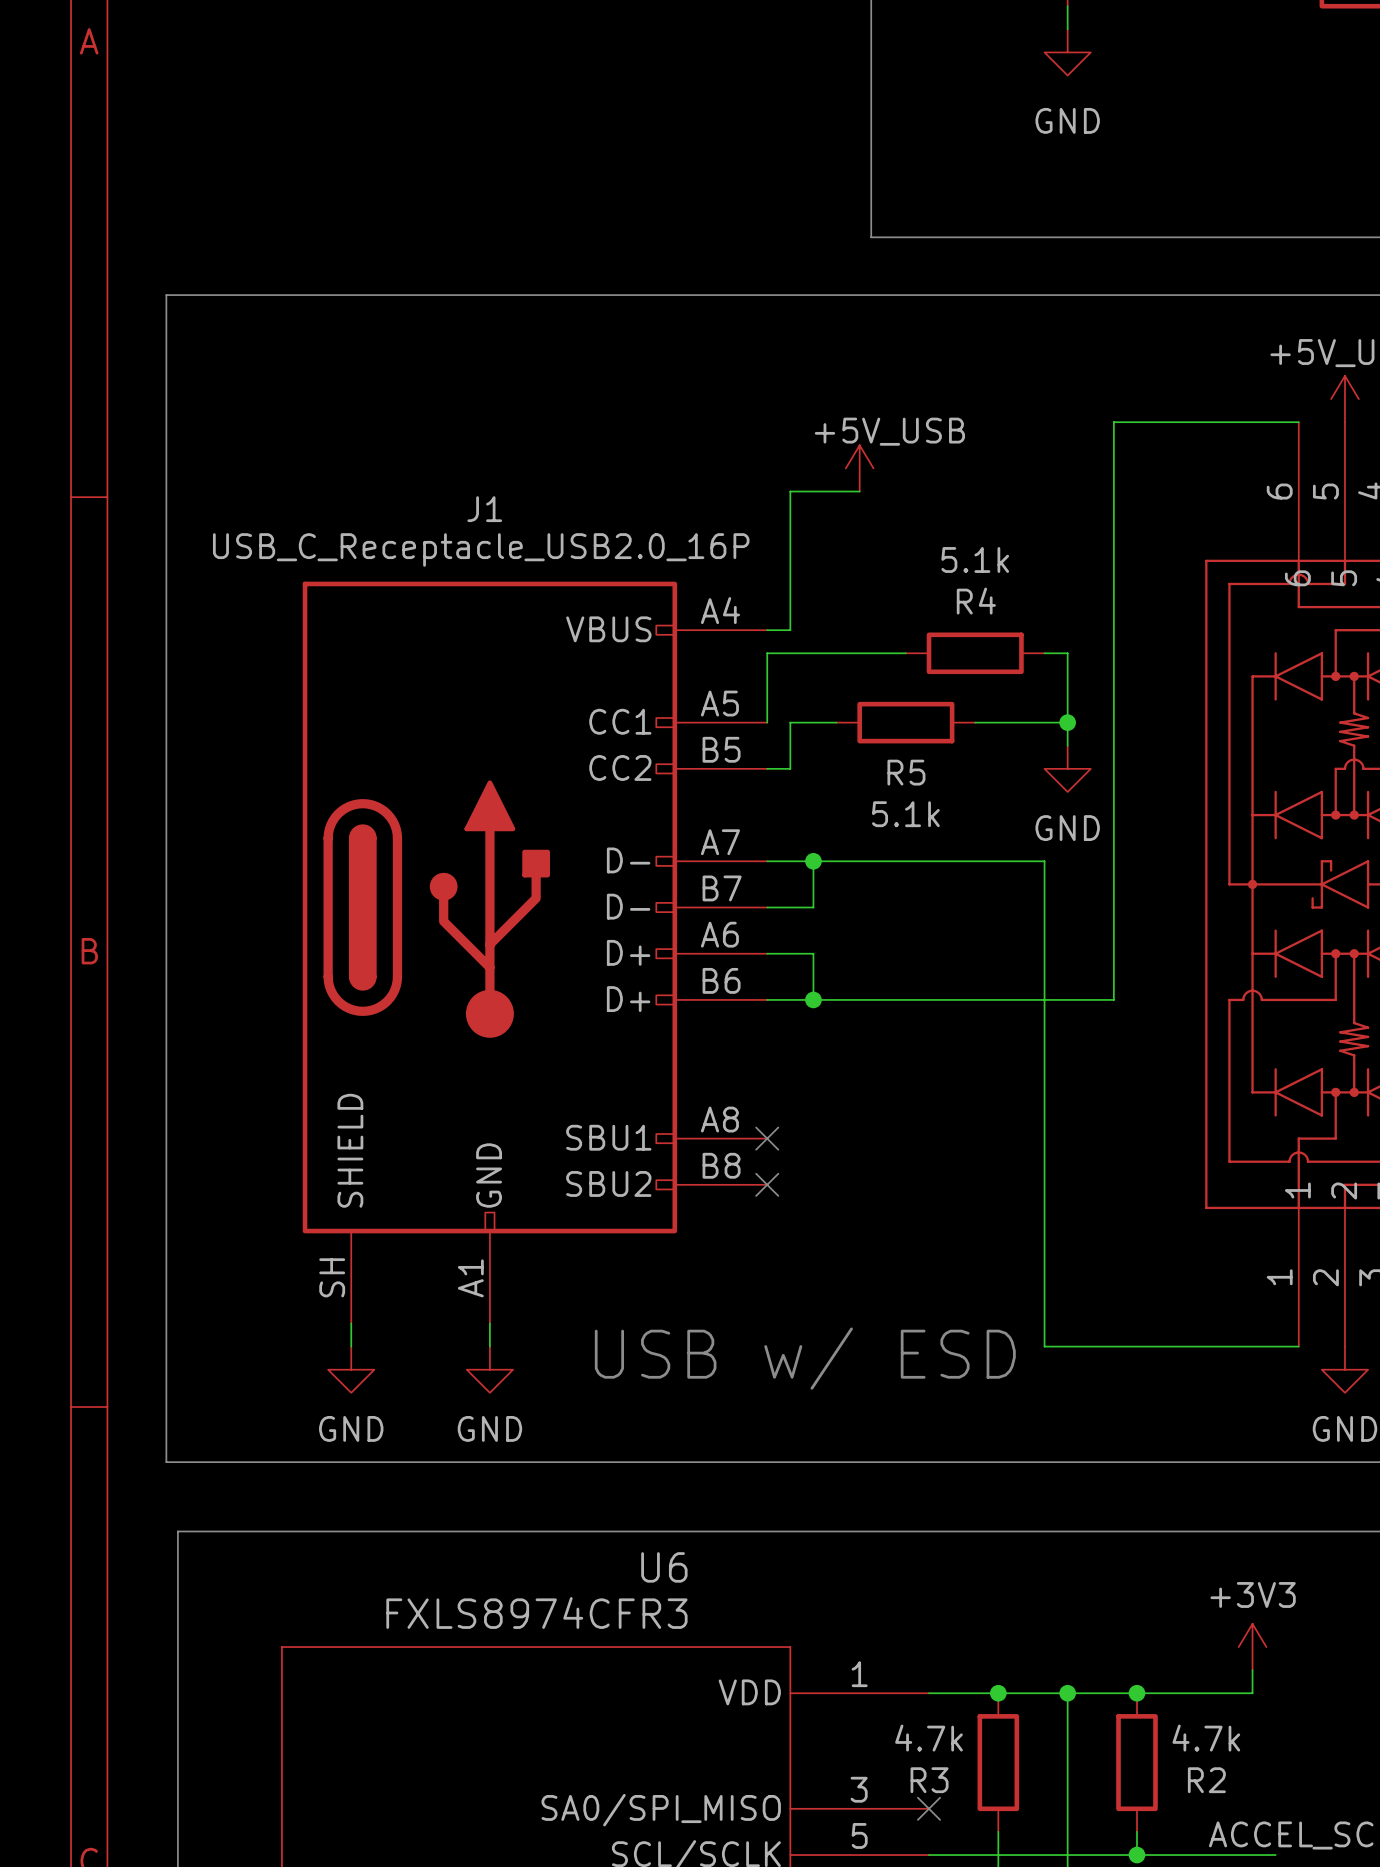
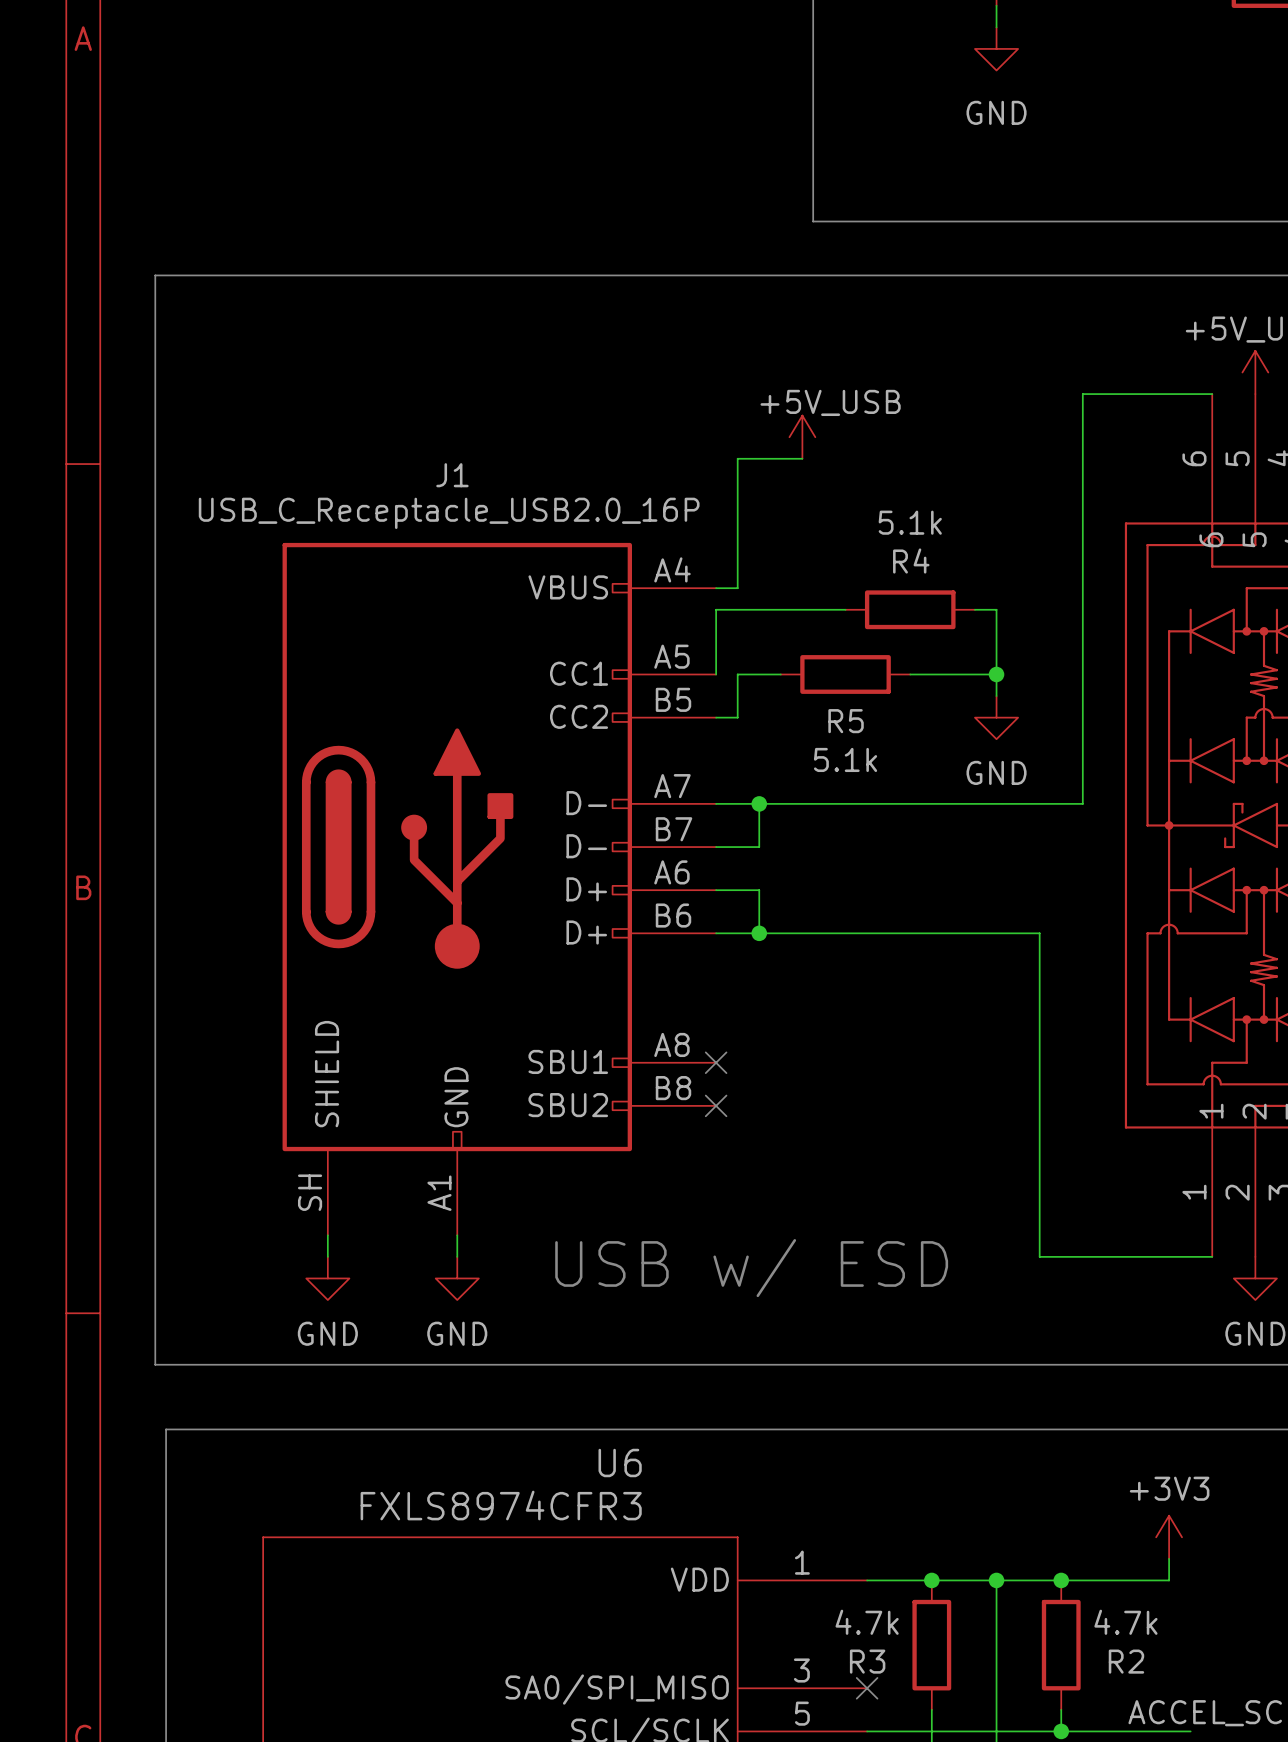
wire: (1160, 422) (1113, 422) (1113, 999) -> (1082, 394) (1082, 803) (974, 803)
wire: (1044, 861) (1044, 1346) (1113, 1346) -> (1039, 933) (1039, 1256)

